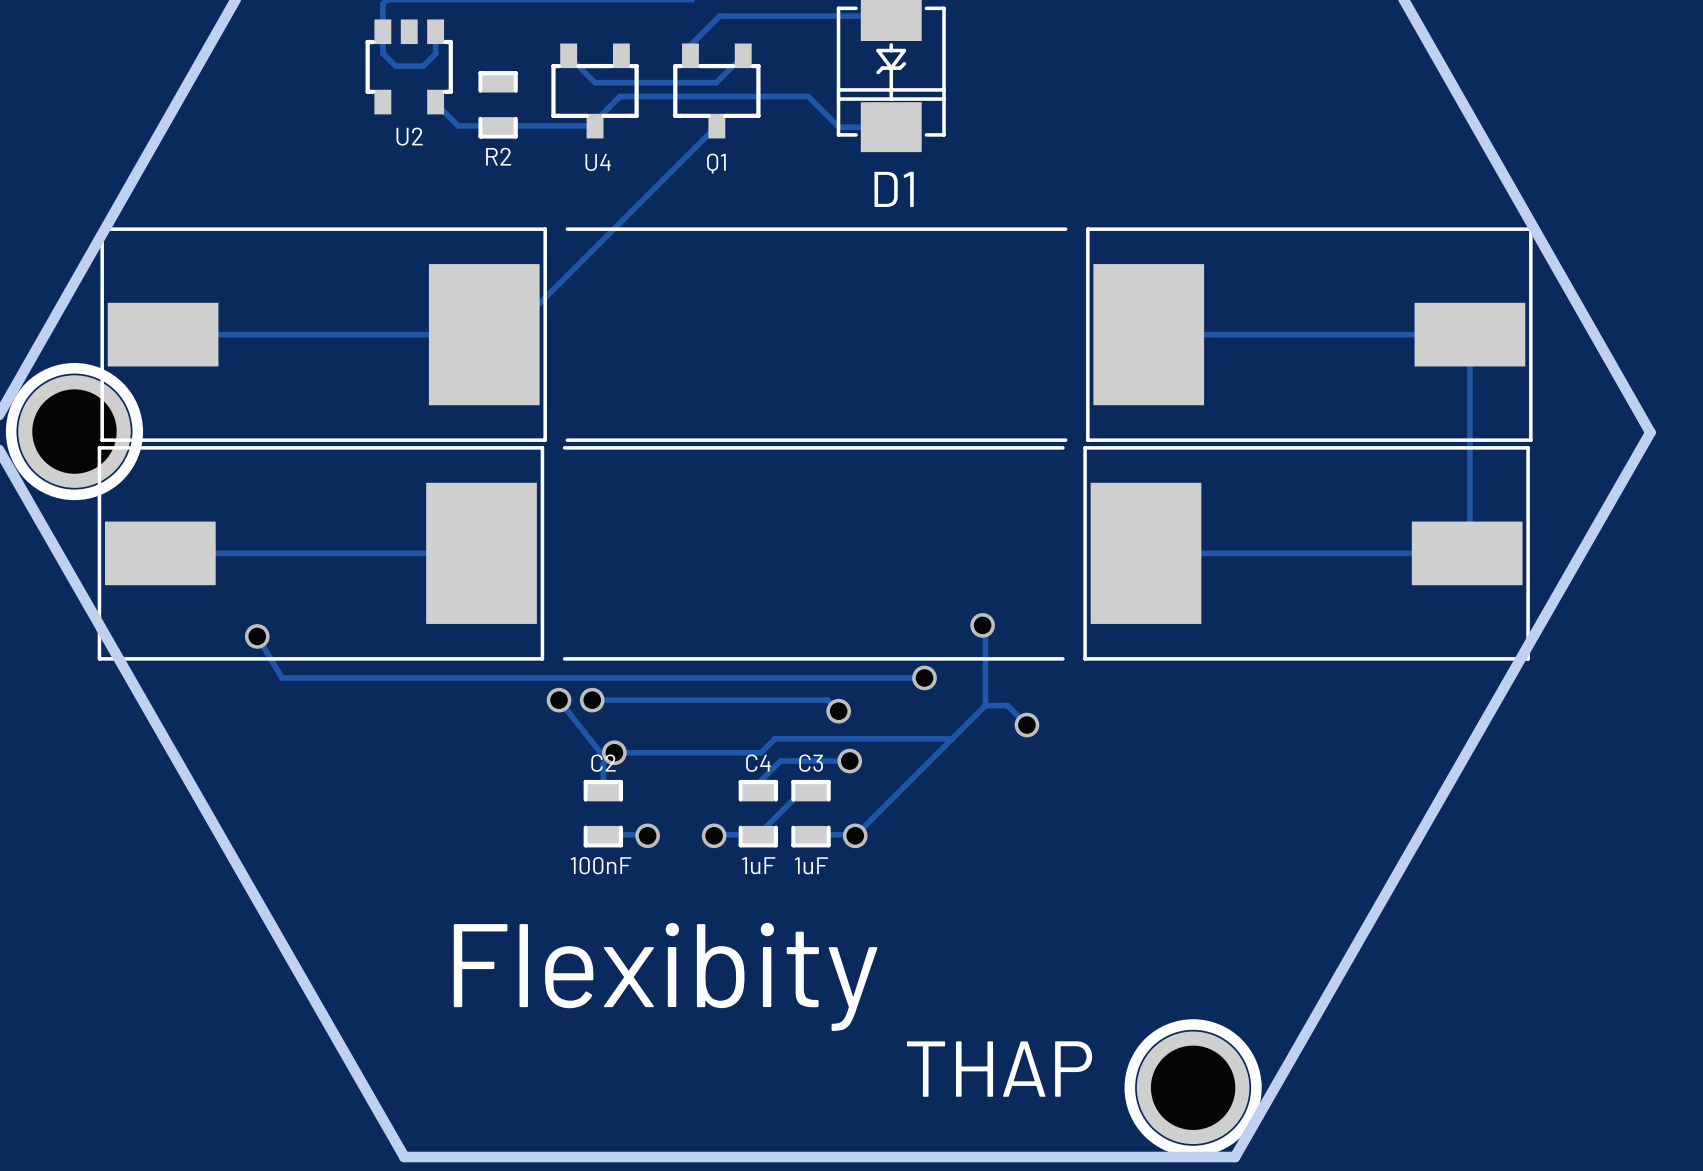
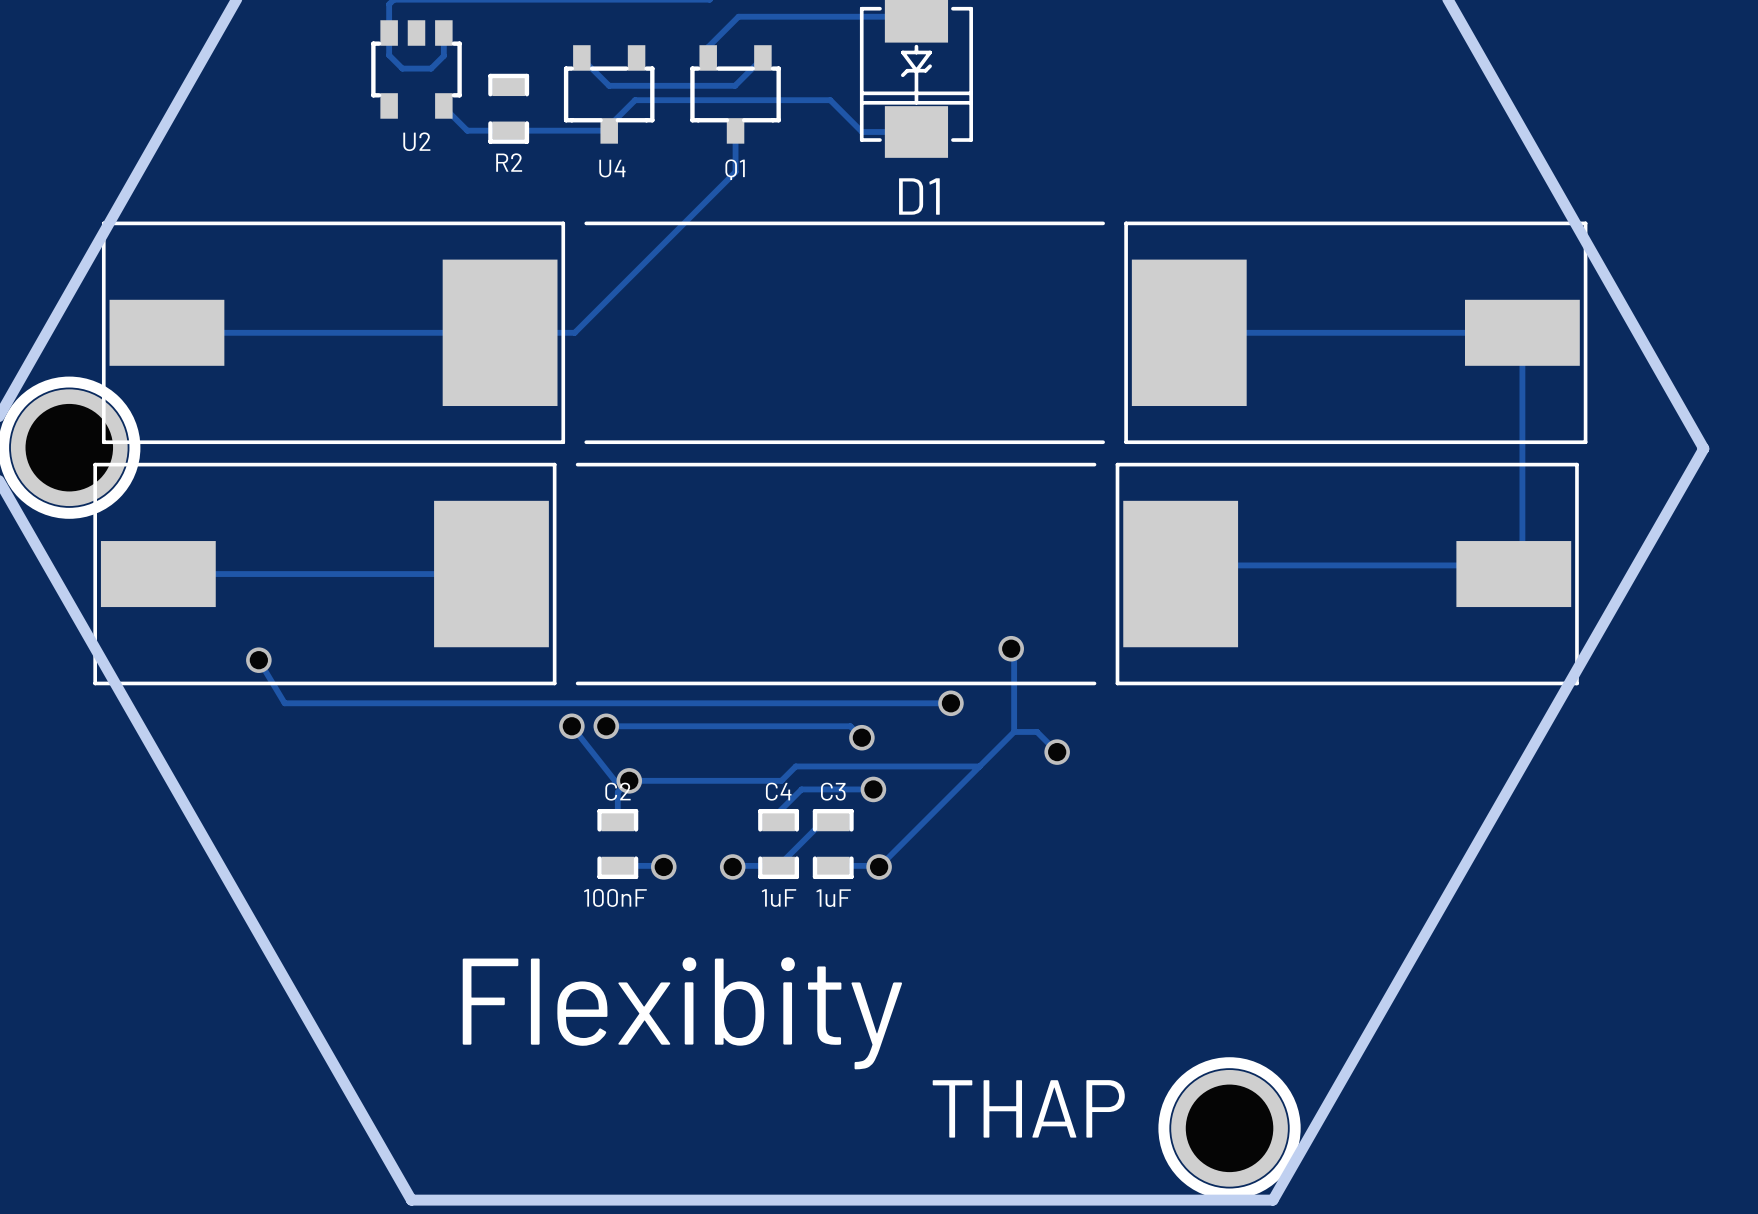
track: (716, 126) (508, 334) (163, 334) -> (735, 130) (735, 171) (574, 332) (166, 332)
track: none -> (1189, 332) (1522, 332) (1522, 565) (1189, 565)
part position: (816, 334) -> (844, 332)
track: (1148, 334) (1469, 334) (1469, 550) (1467, 553) (1145, 553) -> none

